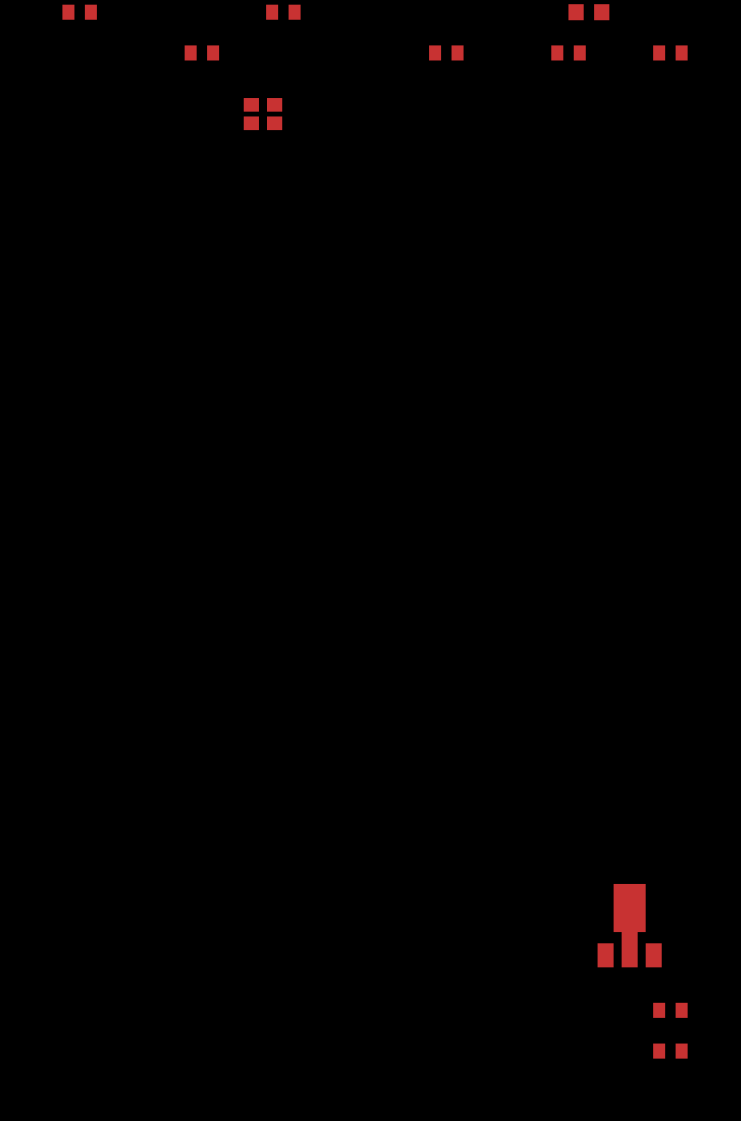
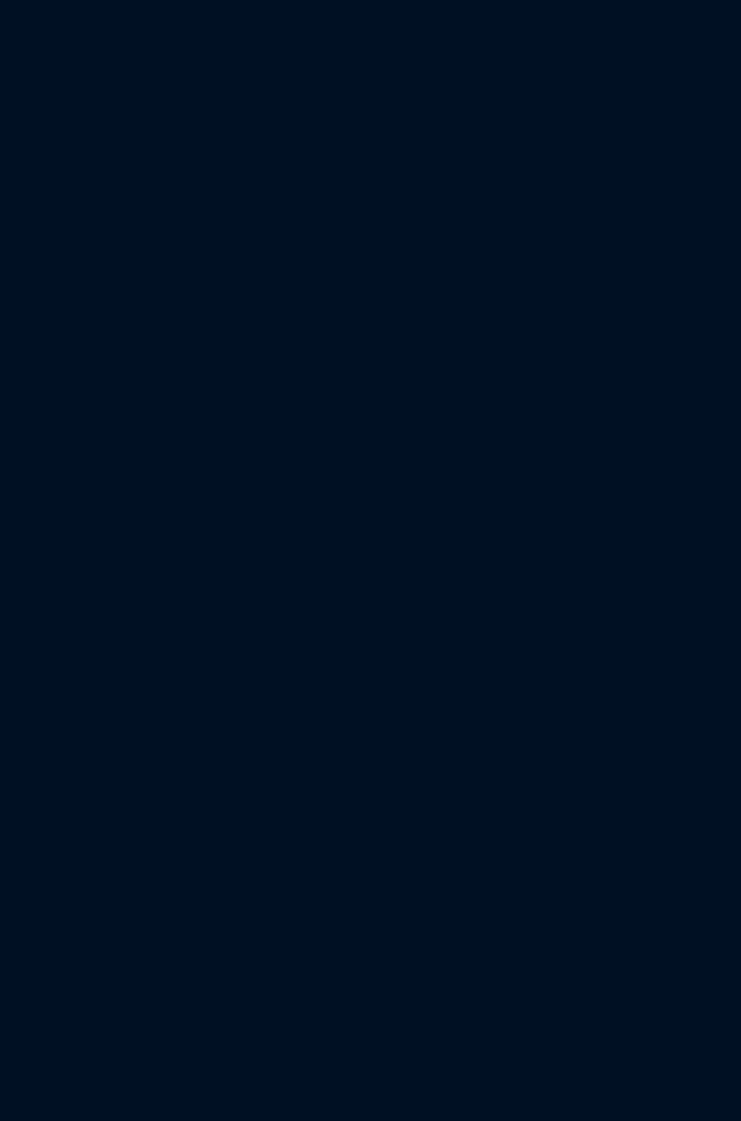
part: (79, 12) -> none
part: (283, 12) -> none
part: (588, 12) -> none
part: (201, 52) -> none
part: (446, 52) -> none
part: (568, 52) -> none
part: (670, 52) -> none
part: (262, 114) -> none
part: (629, 925) -> none
part: (670, 1010) -> none
part: (670, 1051) -> none

